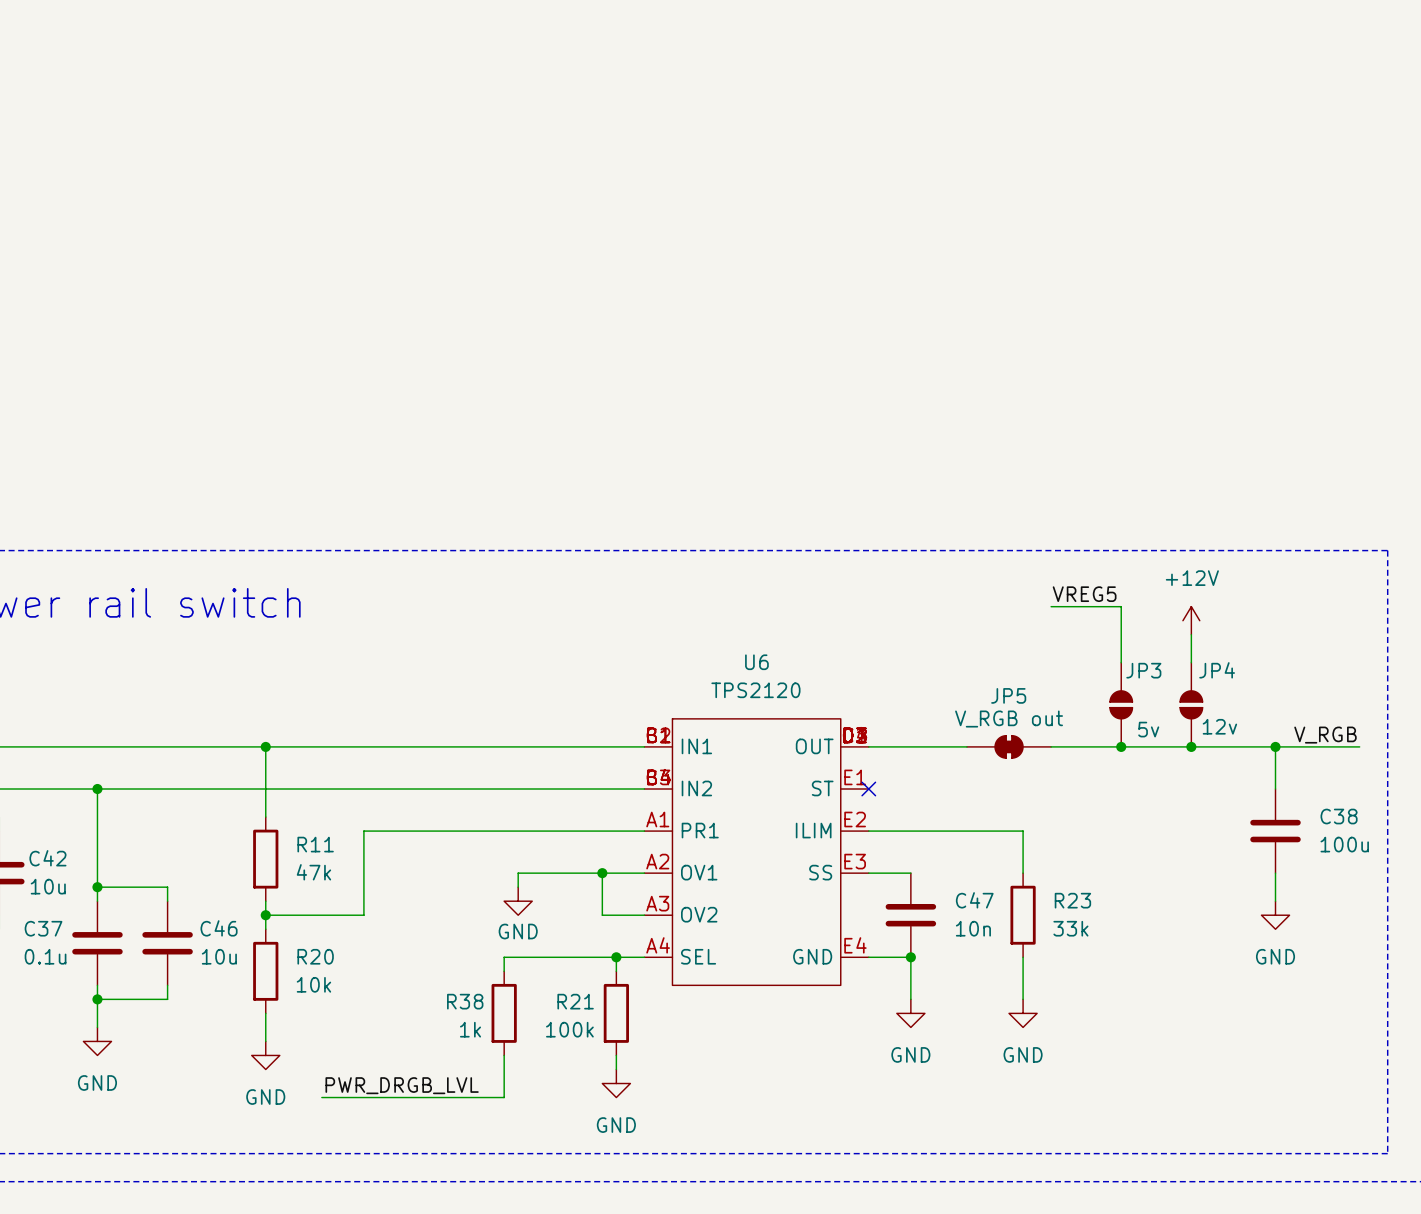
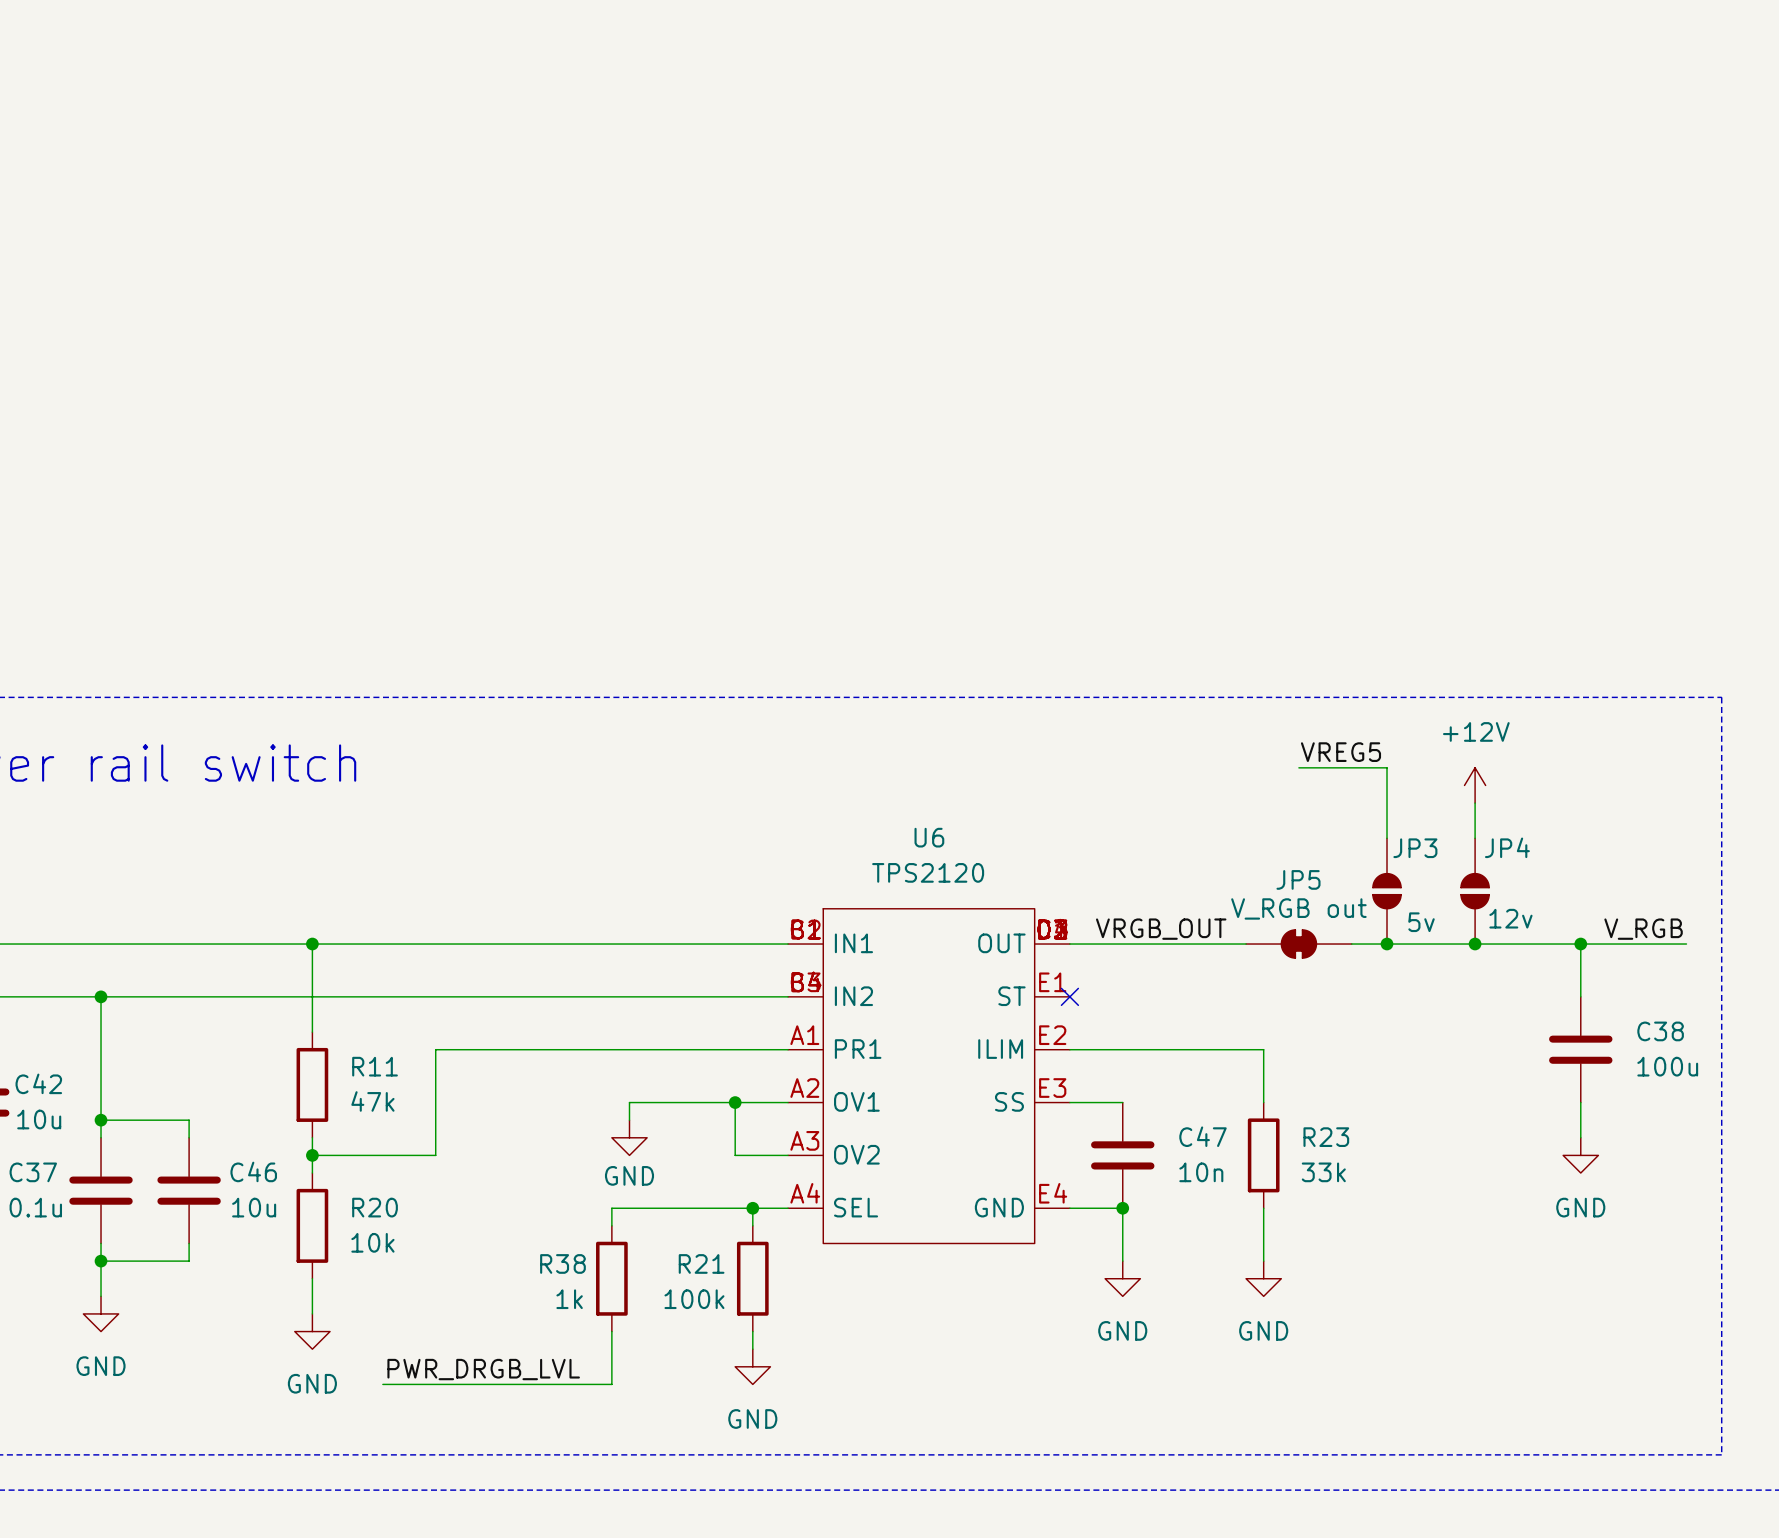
label: none -> VRGB_OUT (1161, 929)
JP5 position: (1009, 746) -> (1298, 944)

